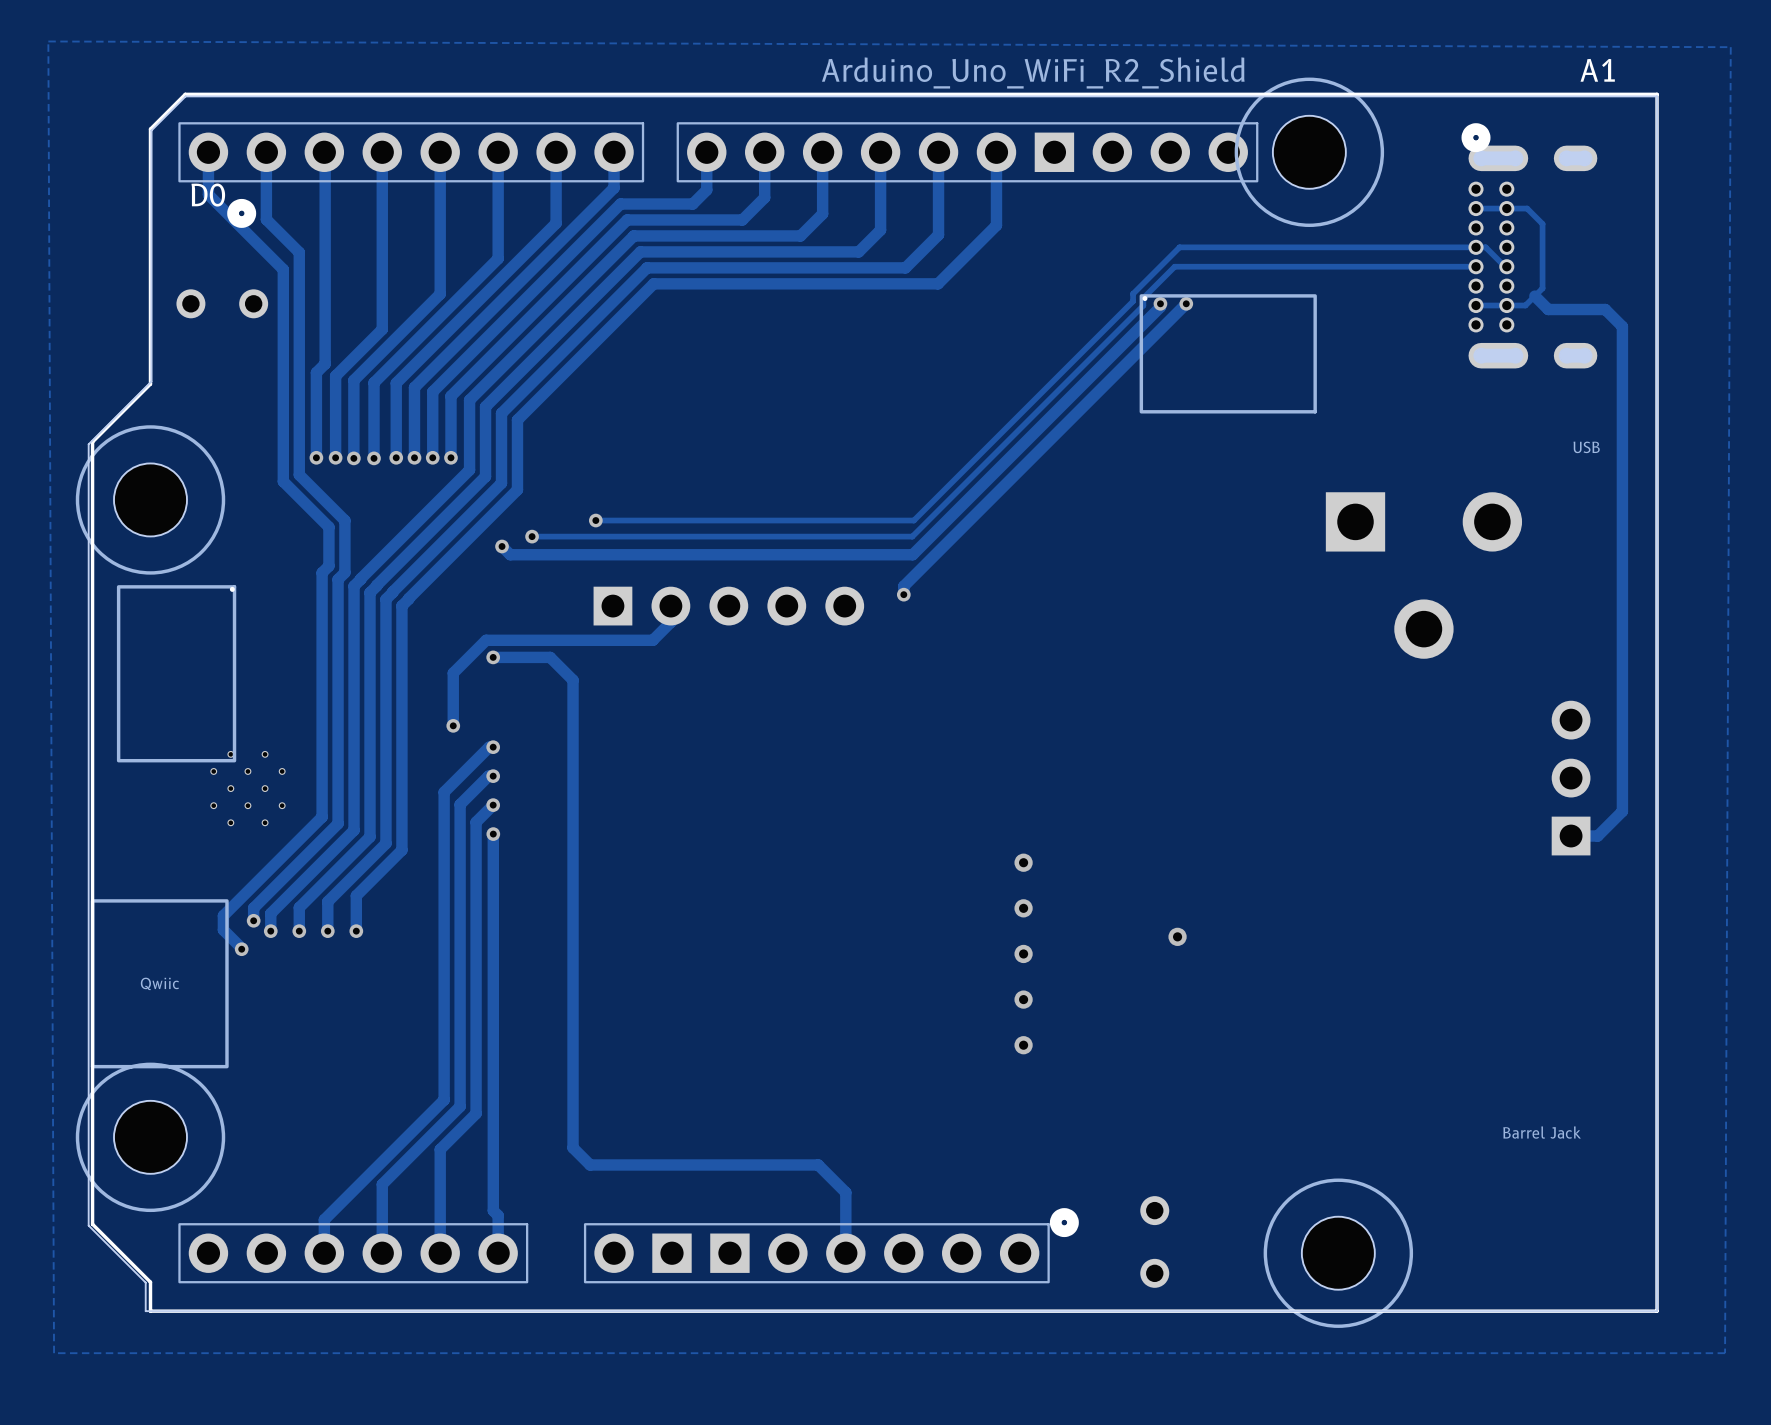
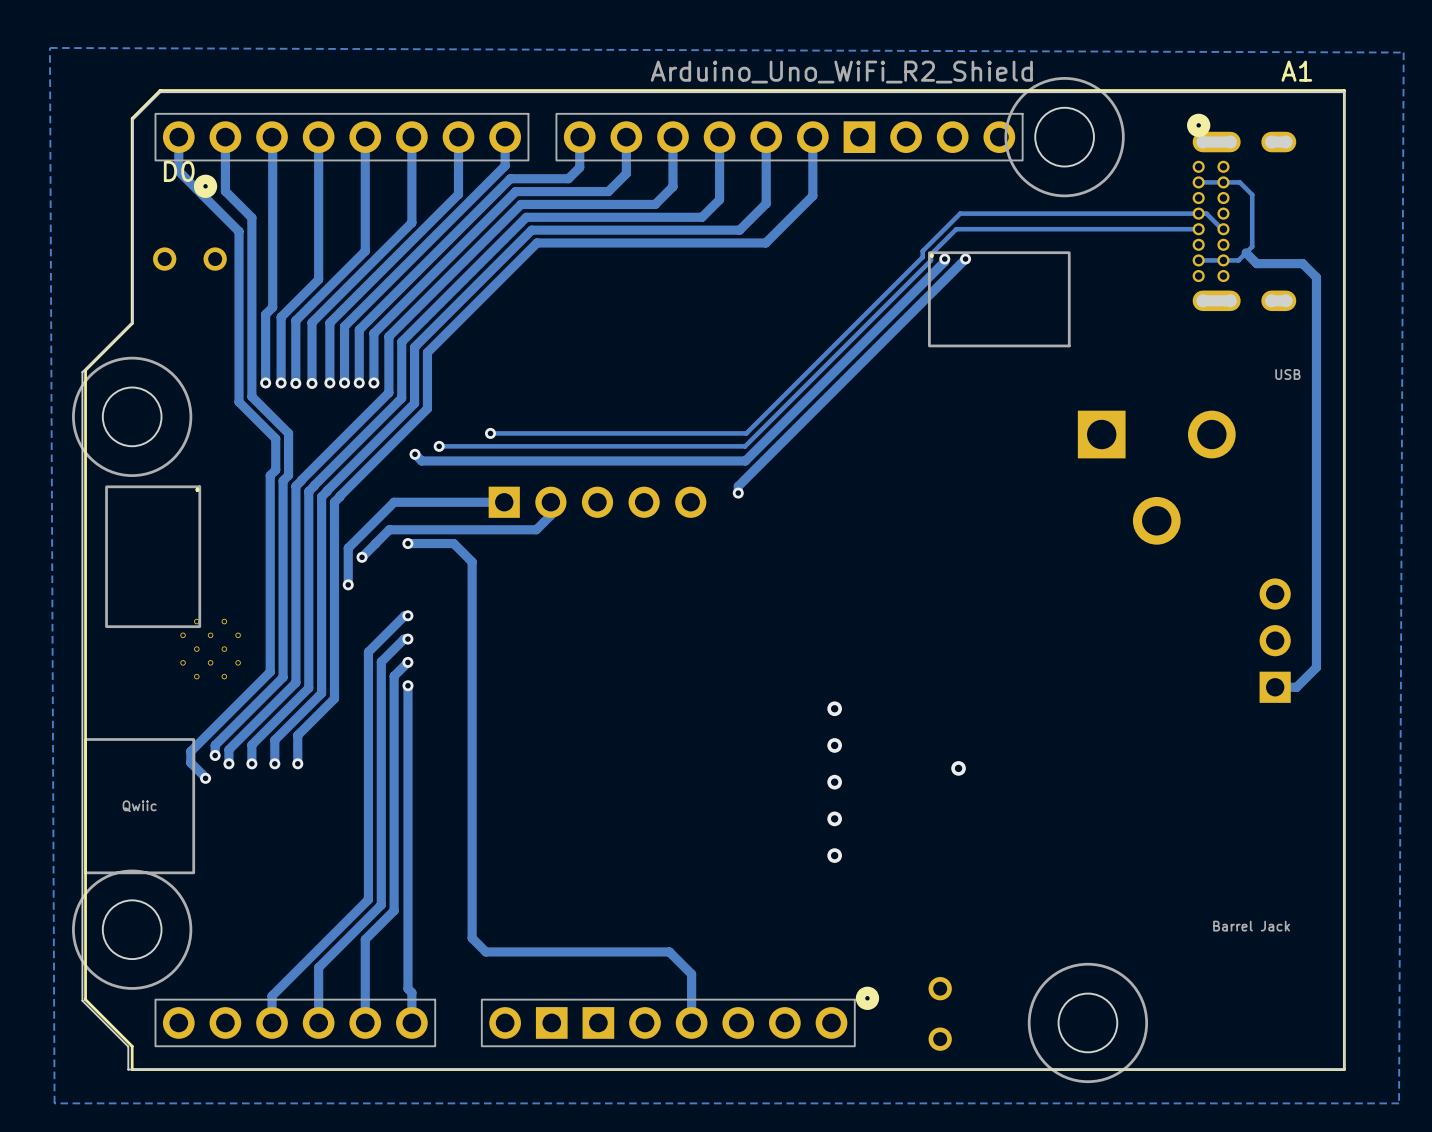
track: none -> (504, 502) (394, 502) (348, 548) (348, 584)
track: (486, 640) (453, 673) (453, 725) -> (402, 529) (389, 529) (375, 543)
track: none -> (375, 543) (362, 557)
via: none -> (362, 557)
via: none -> (348, 584)
via: (453, 725) -> none

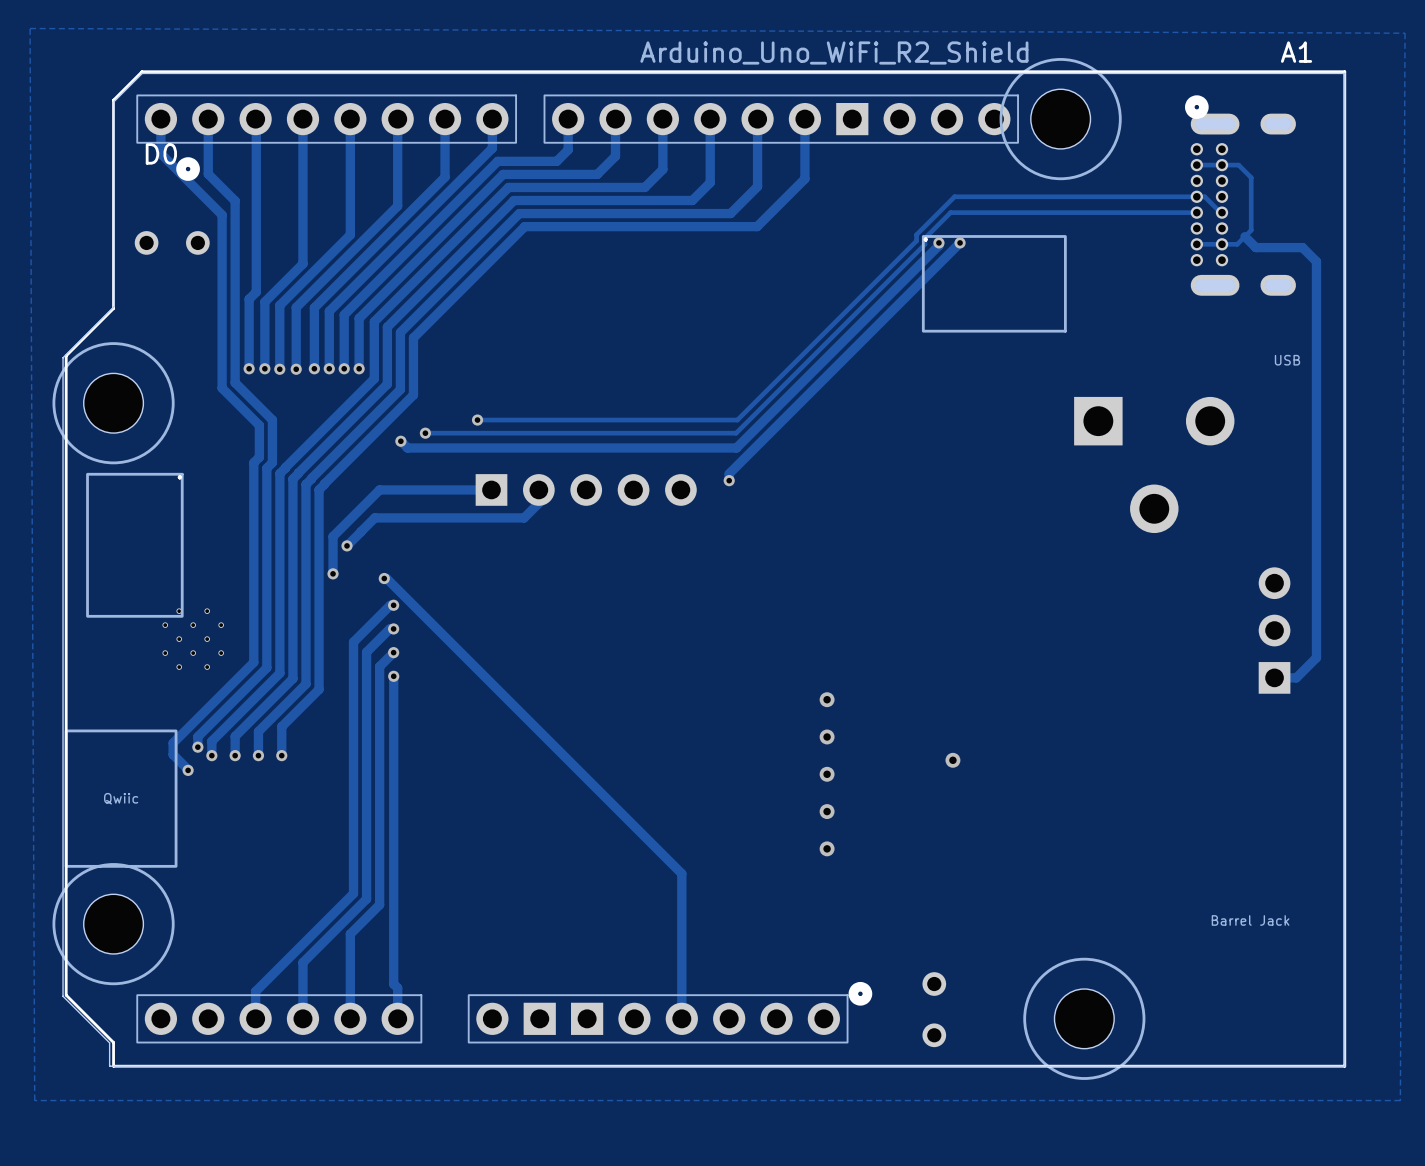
track: (407, 543) (453, 543) (472, 561) (472, 938) (485, 951) (669, 951) (691, 974) -> (384, 578) (386, 578) (681, 873) (681, 969)
via position: (407, 543) -> (384, 578)

